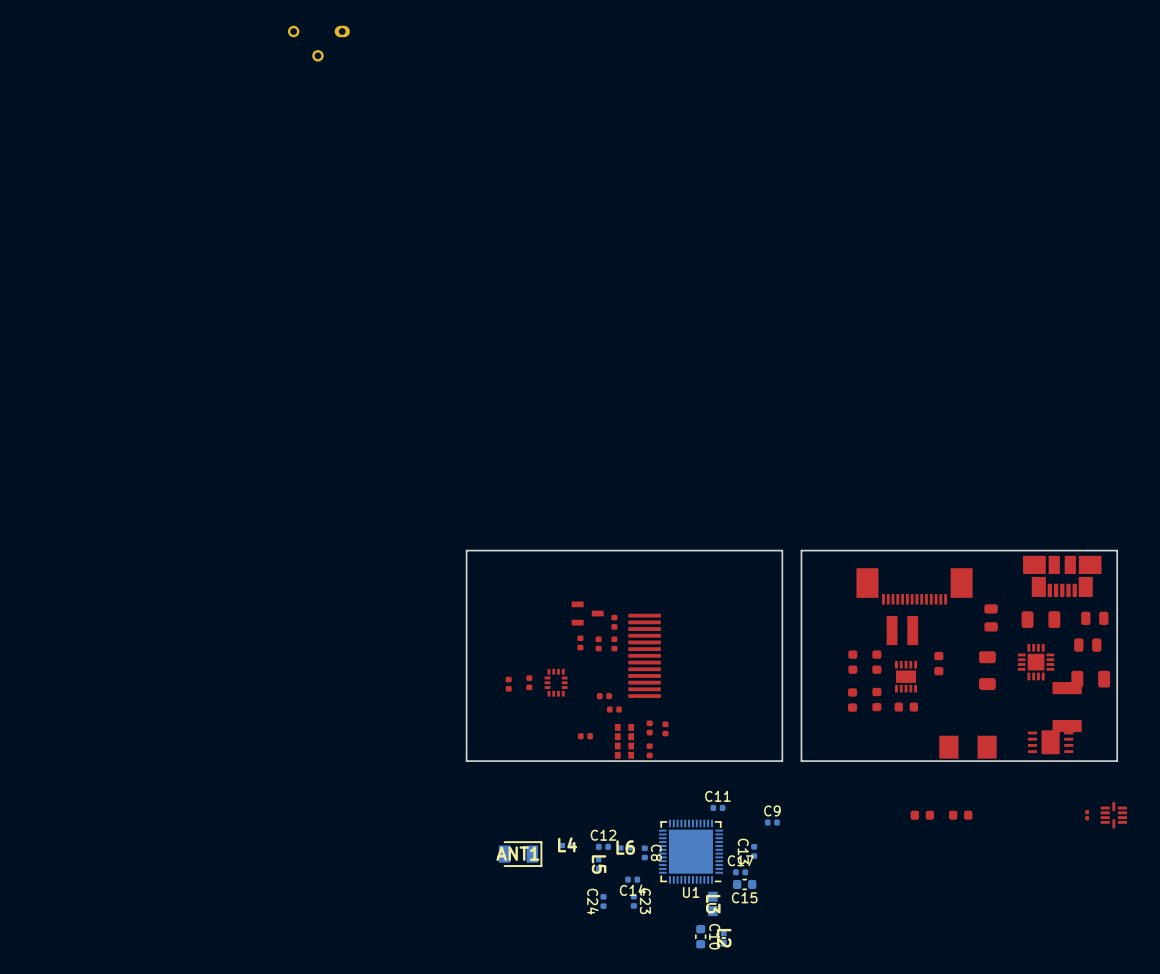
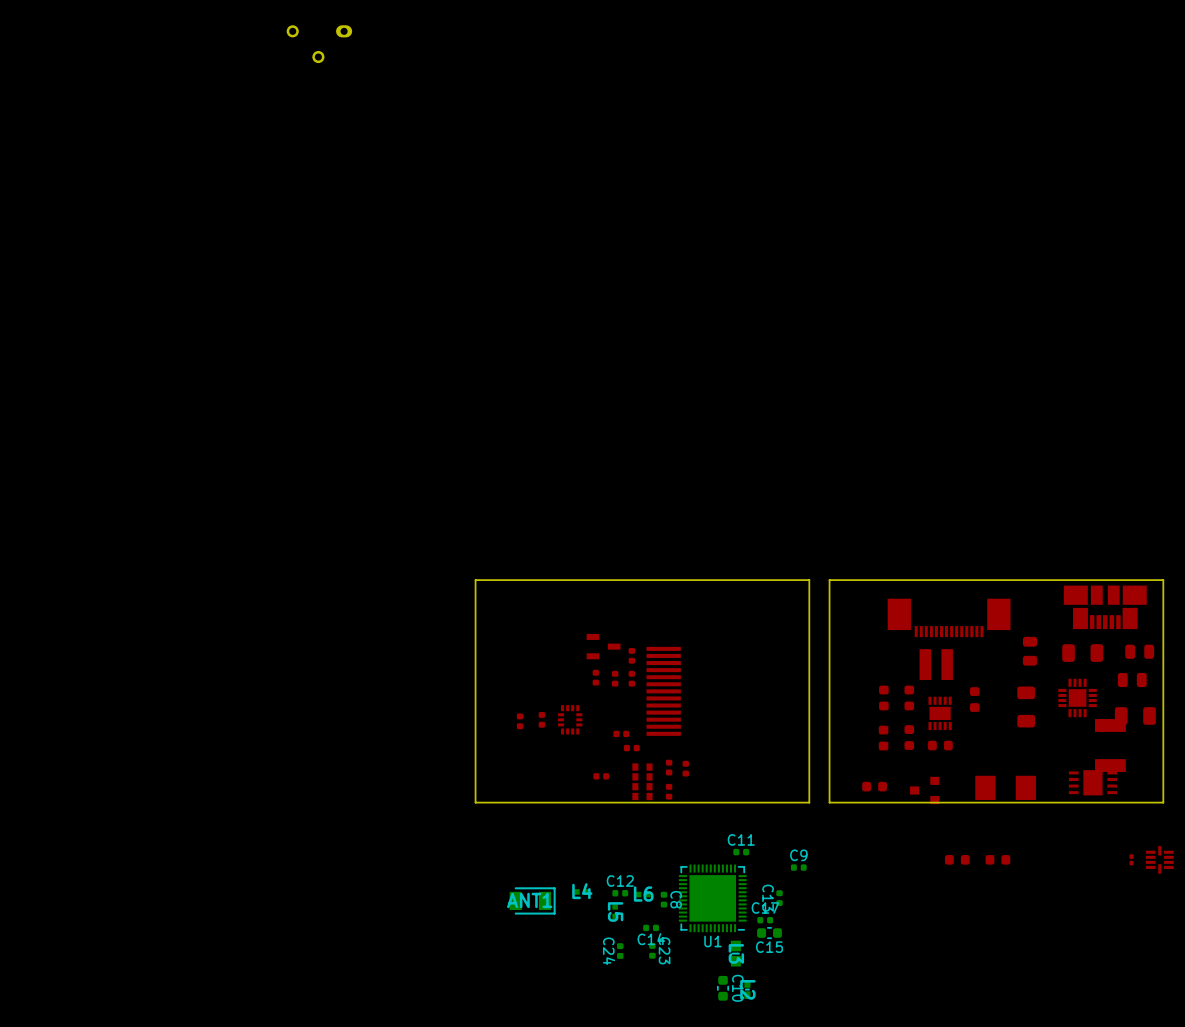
part: none -> (874, 786)
part: none -> (924, 790)

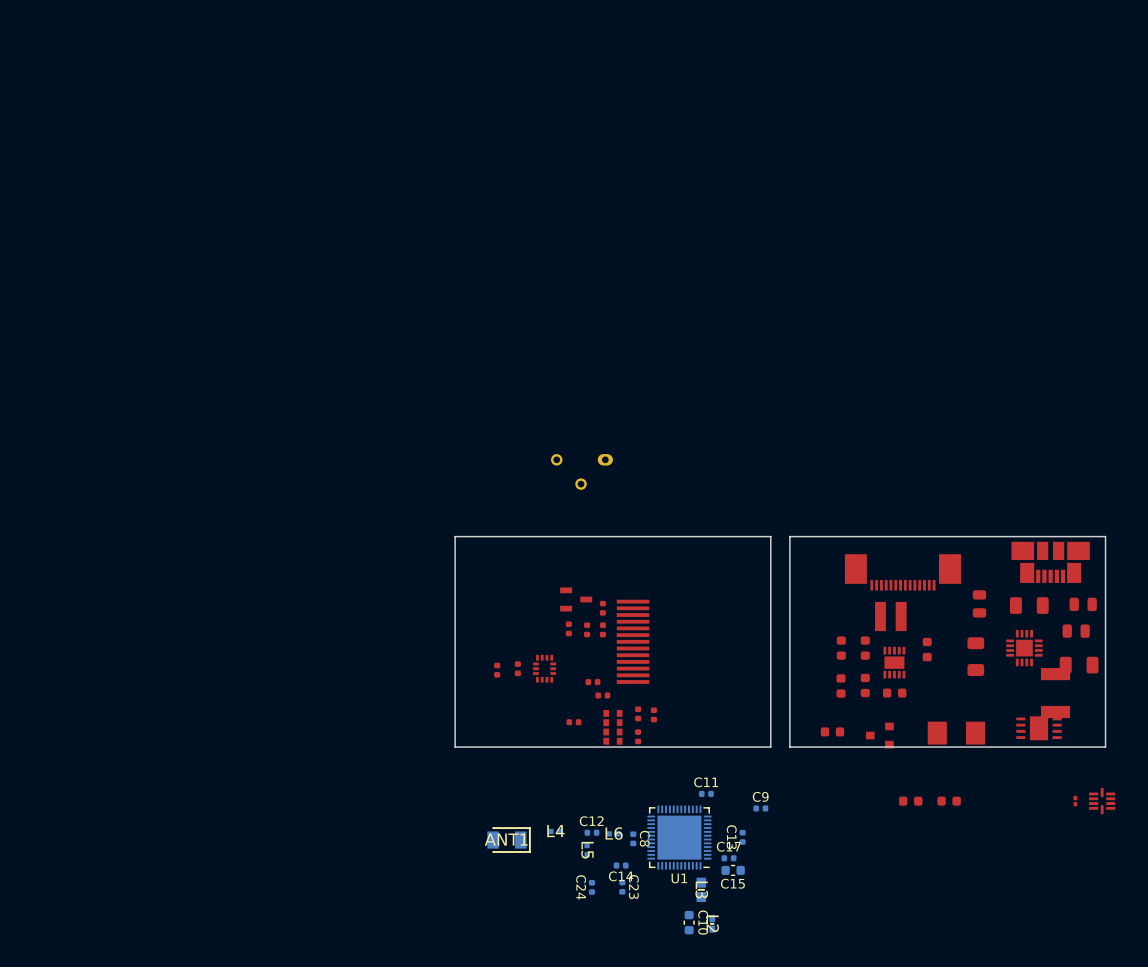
part: (319, 44) -> none
part: none -> (581, 471)

